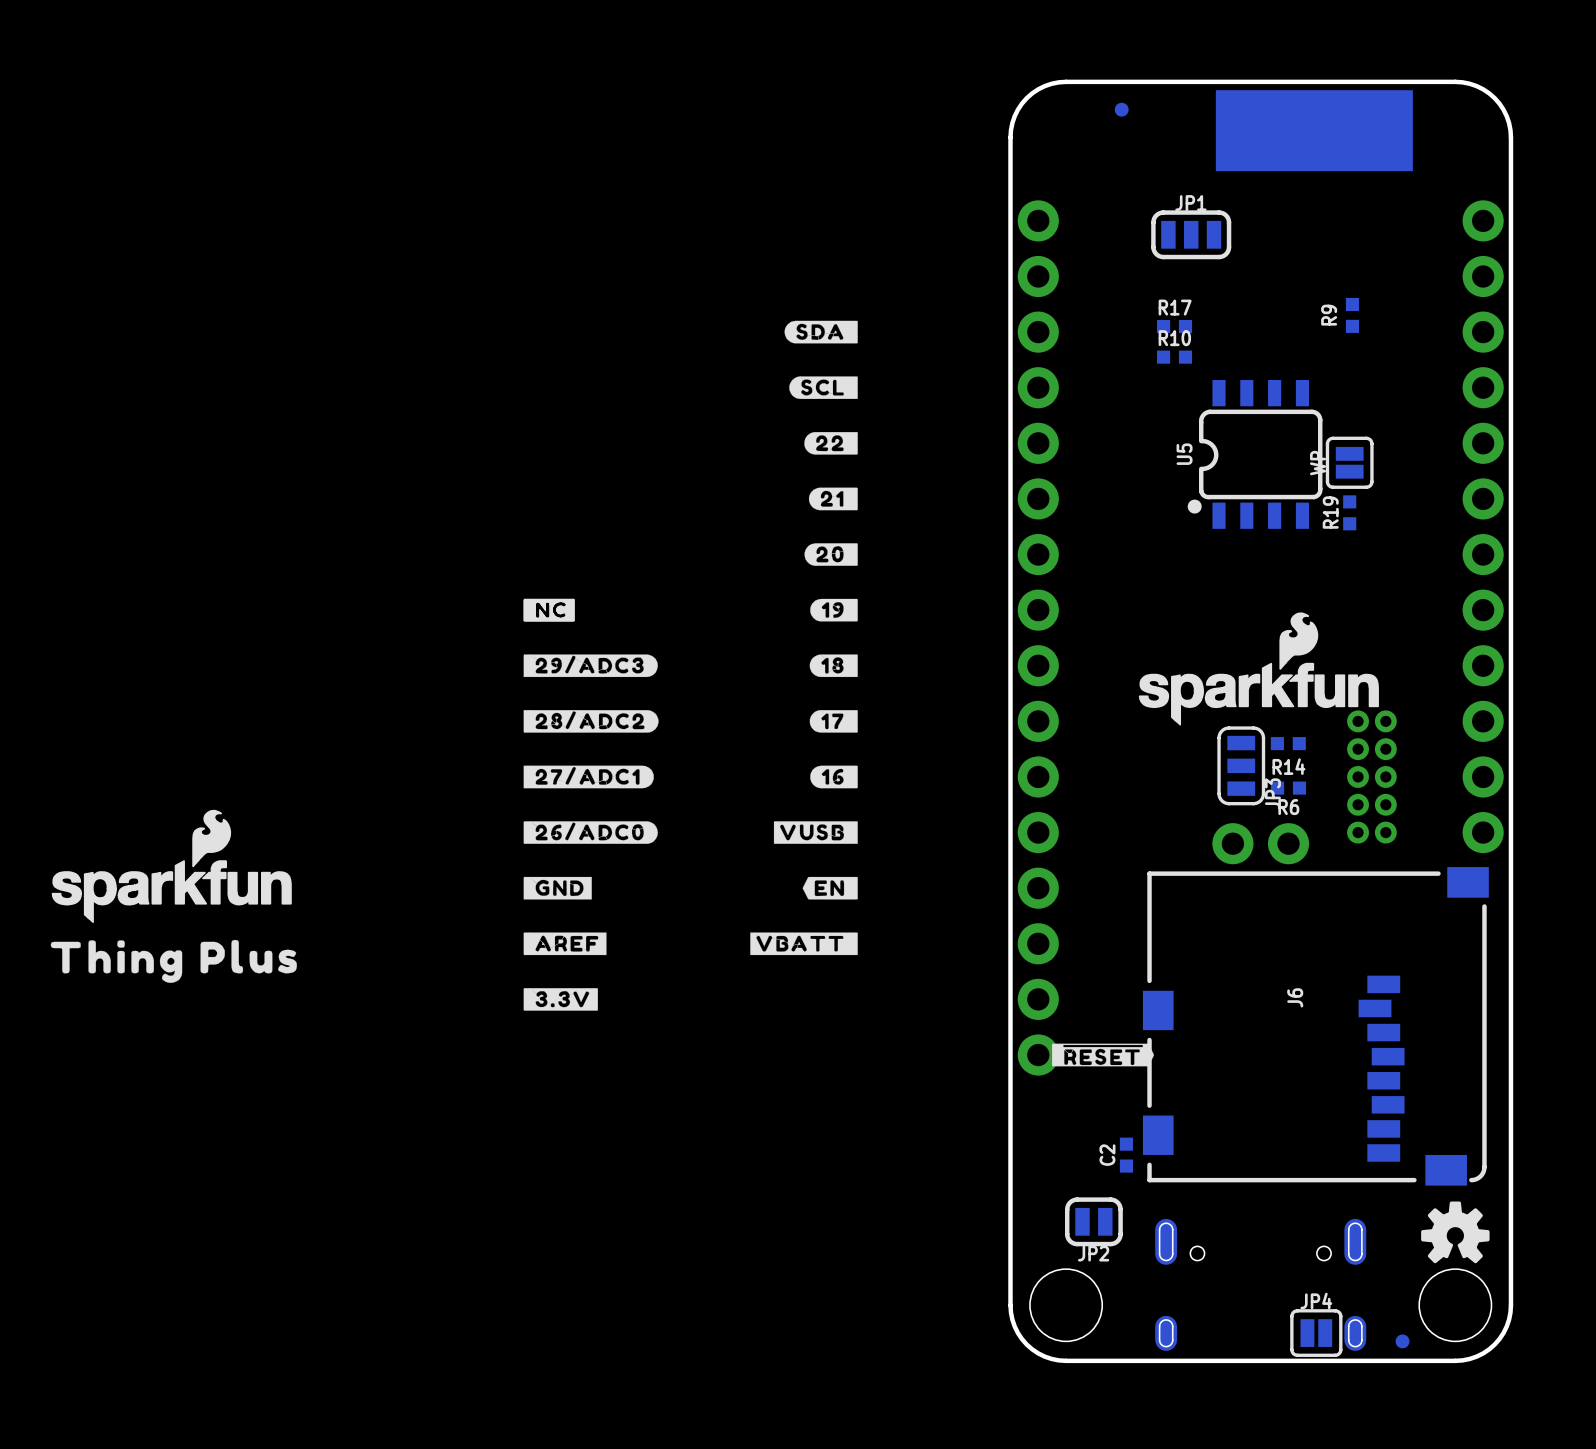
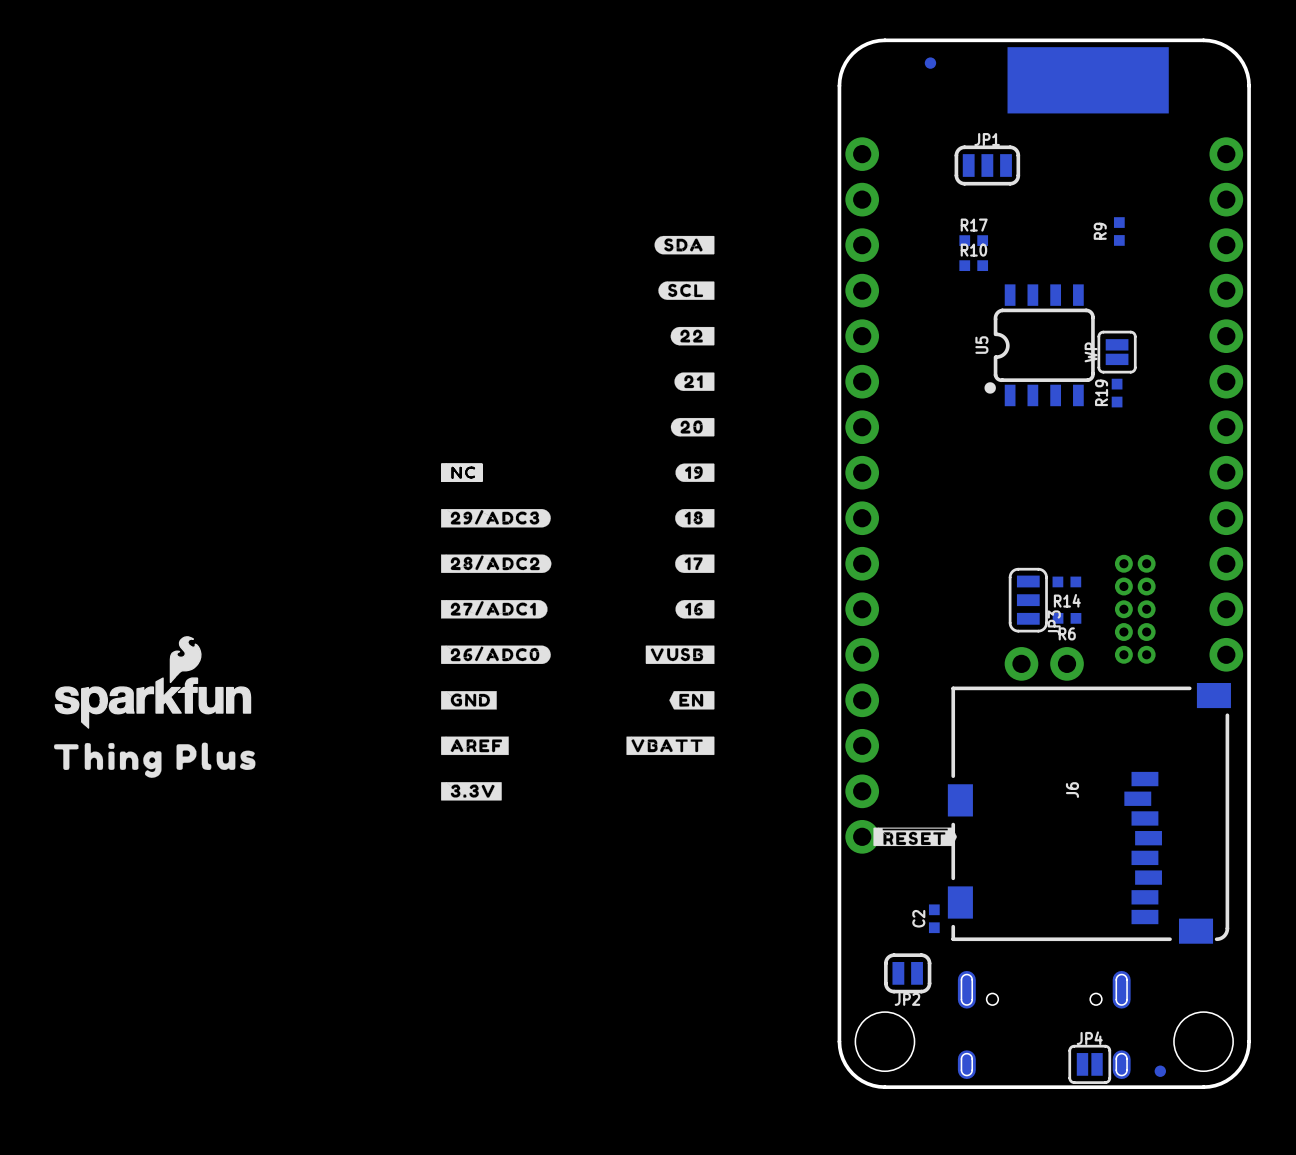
drawing: [1138, 612, 1379, 726] -> none
drawing: [1421, 1201, 1490, 1264] -> none

